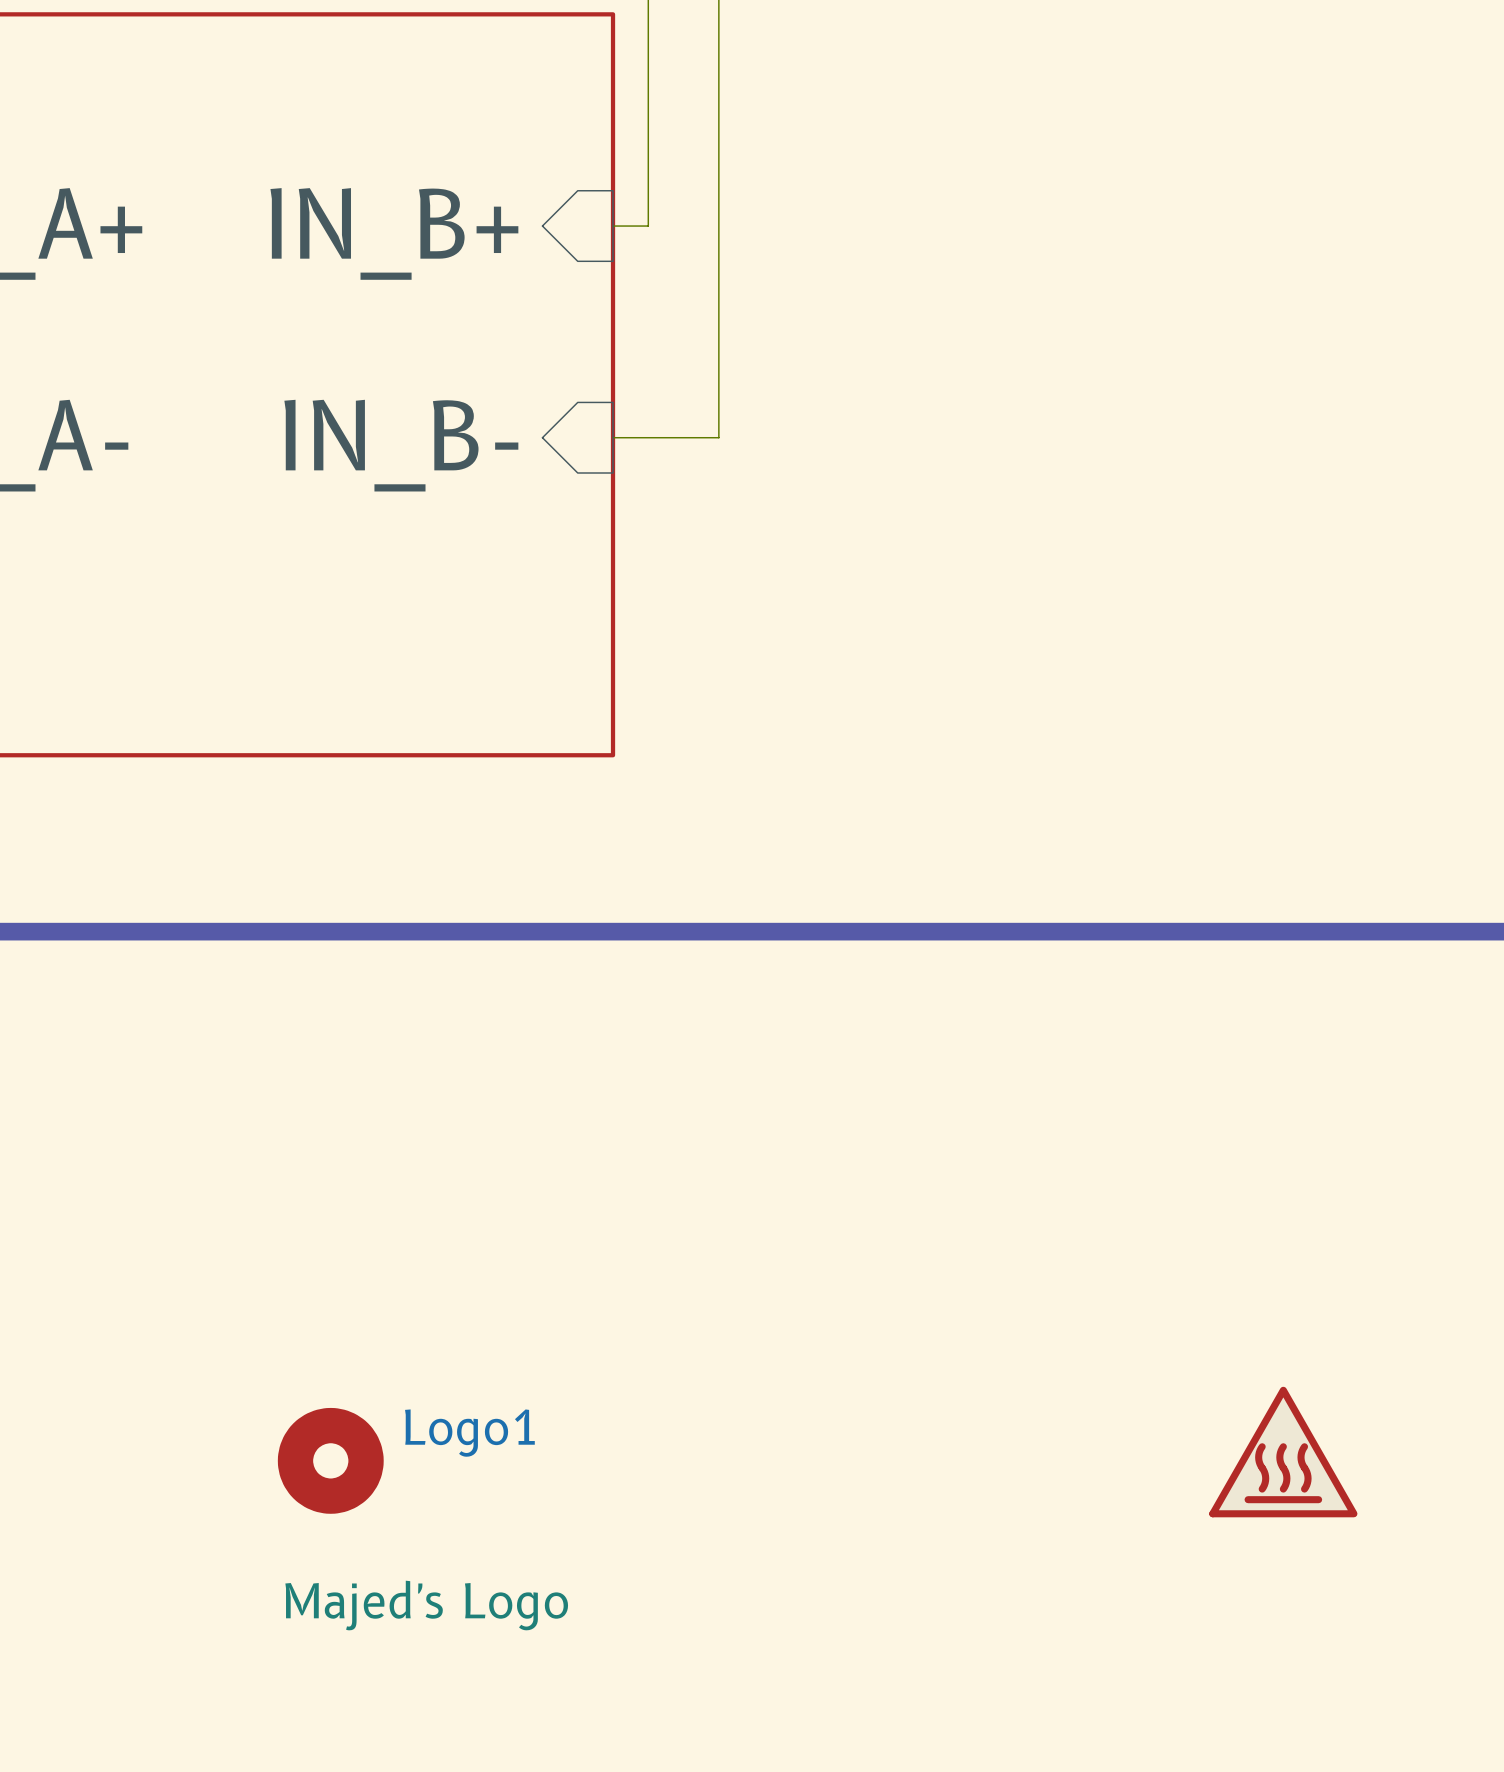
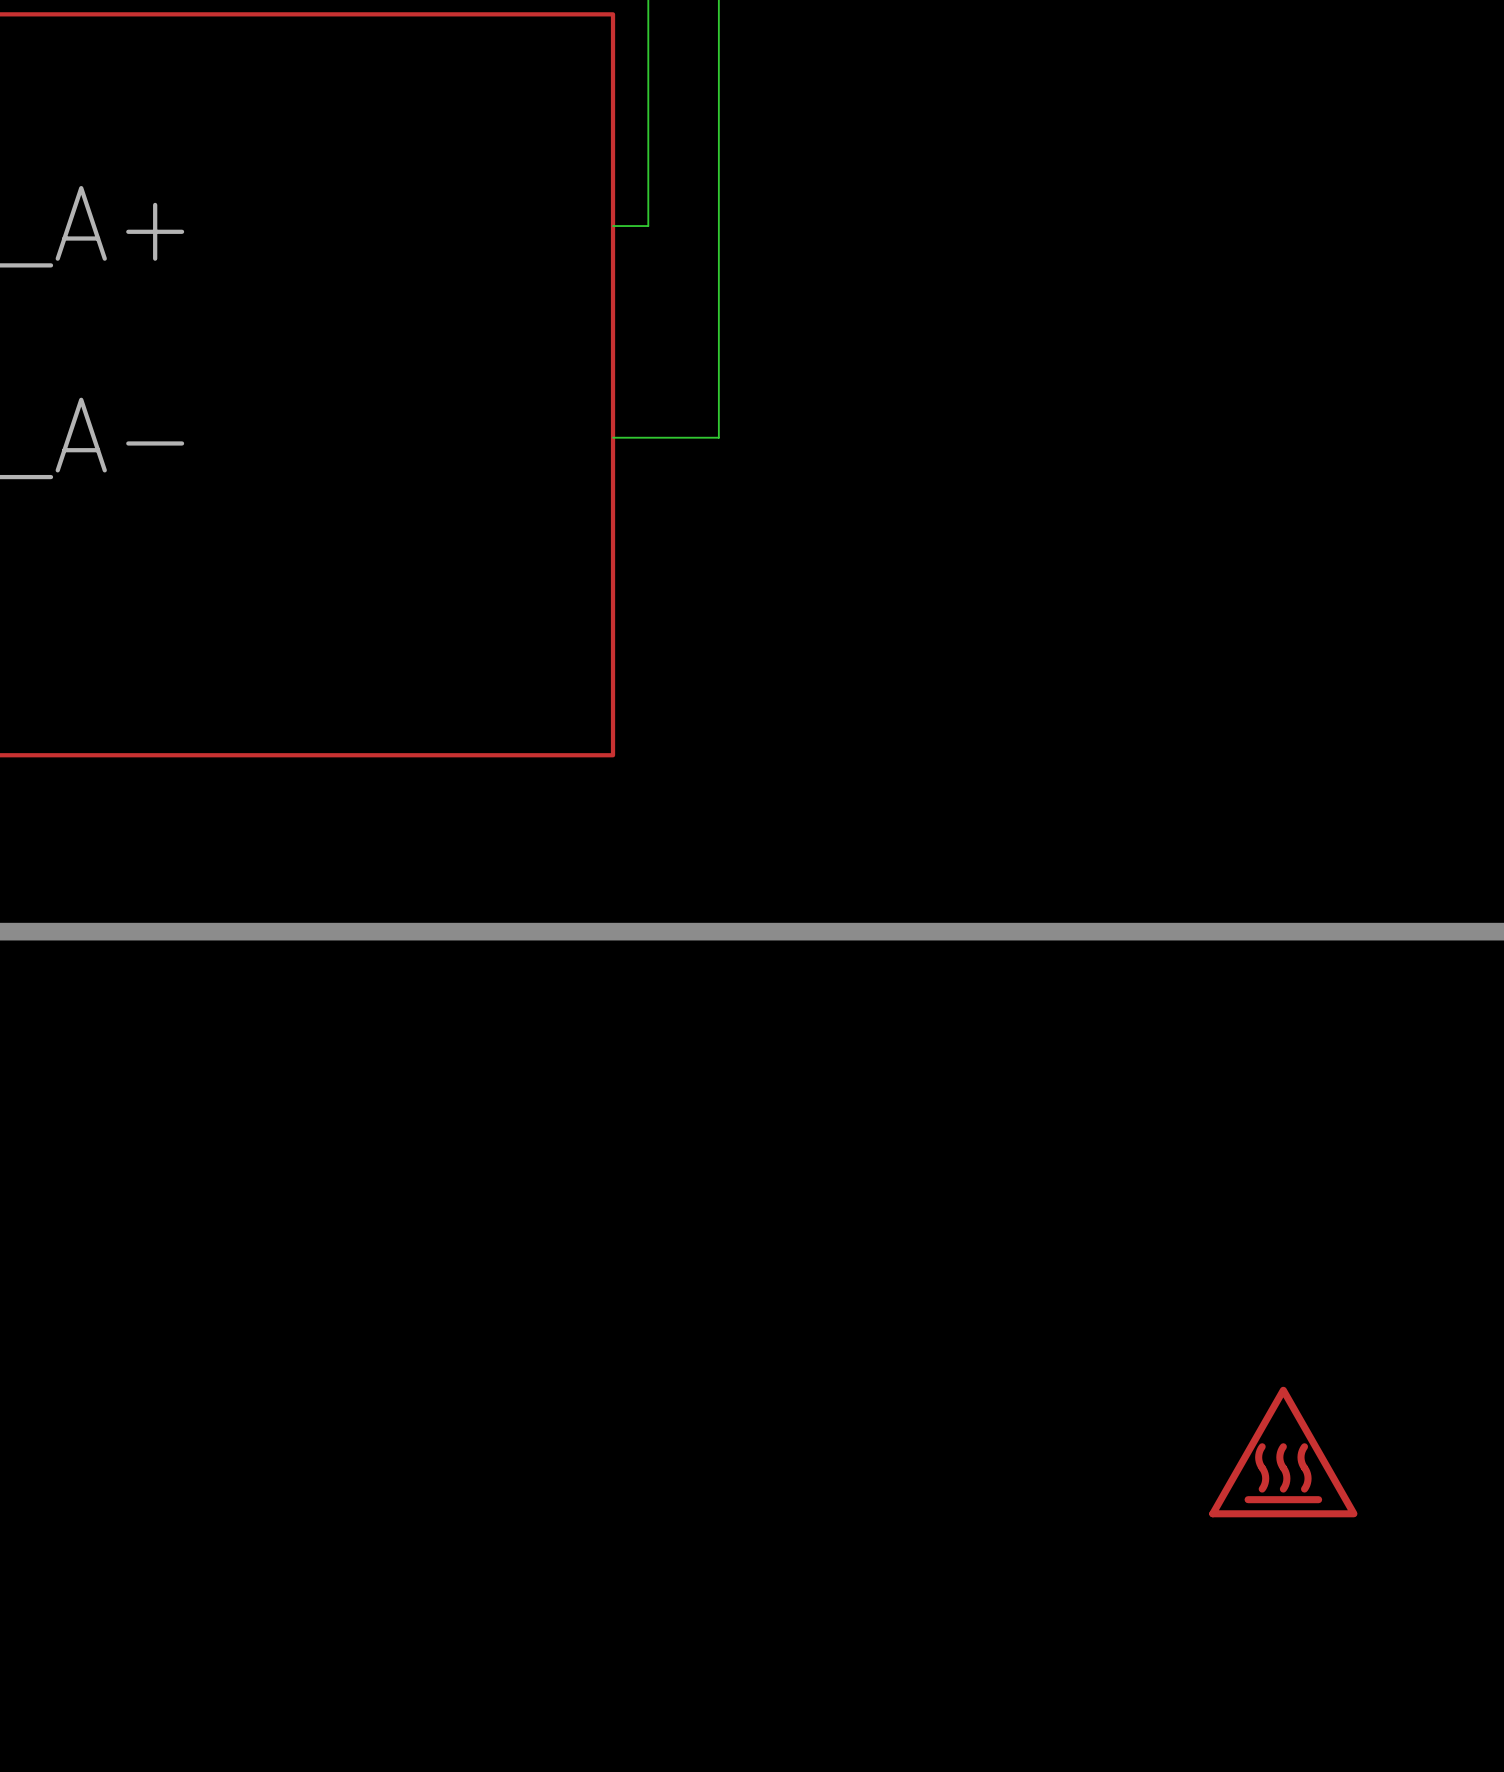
sheet pin: IN_B+ (394, 233) -> none
sheet pin: IN_B- (401, 445) -> none
Logo1: Majed's Logo (330, 1460) -> none

